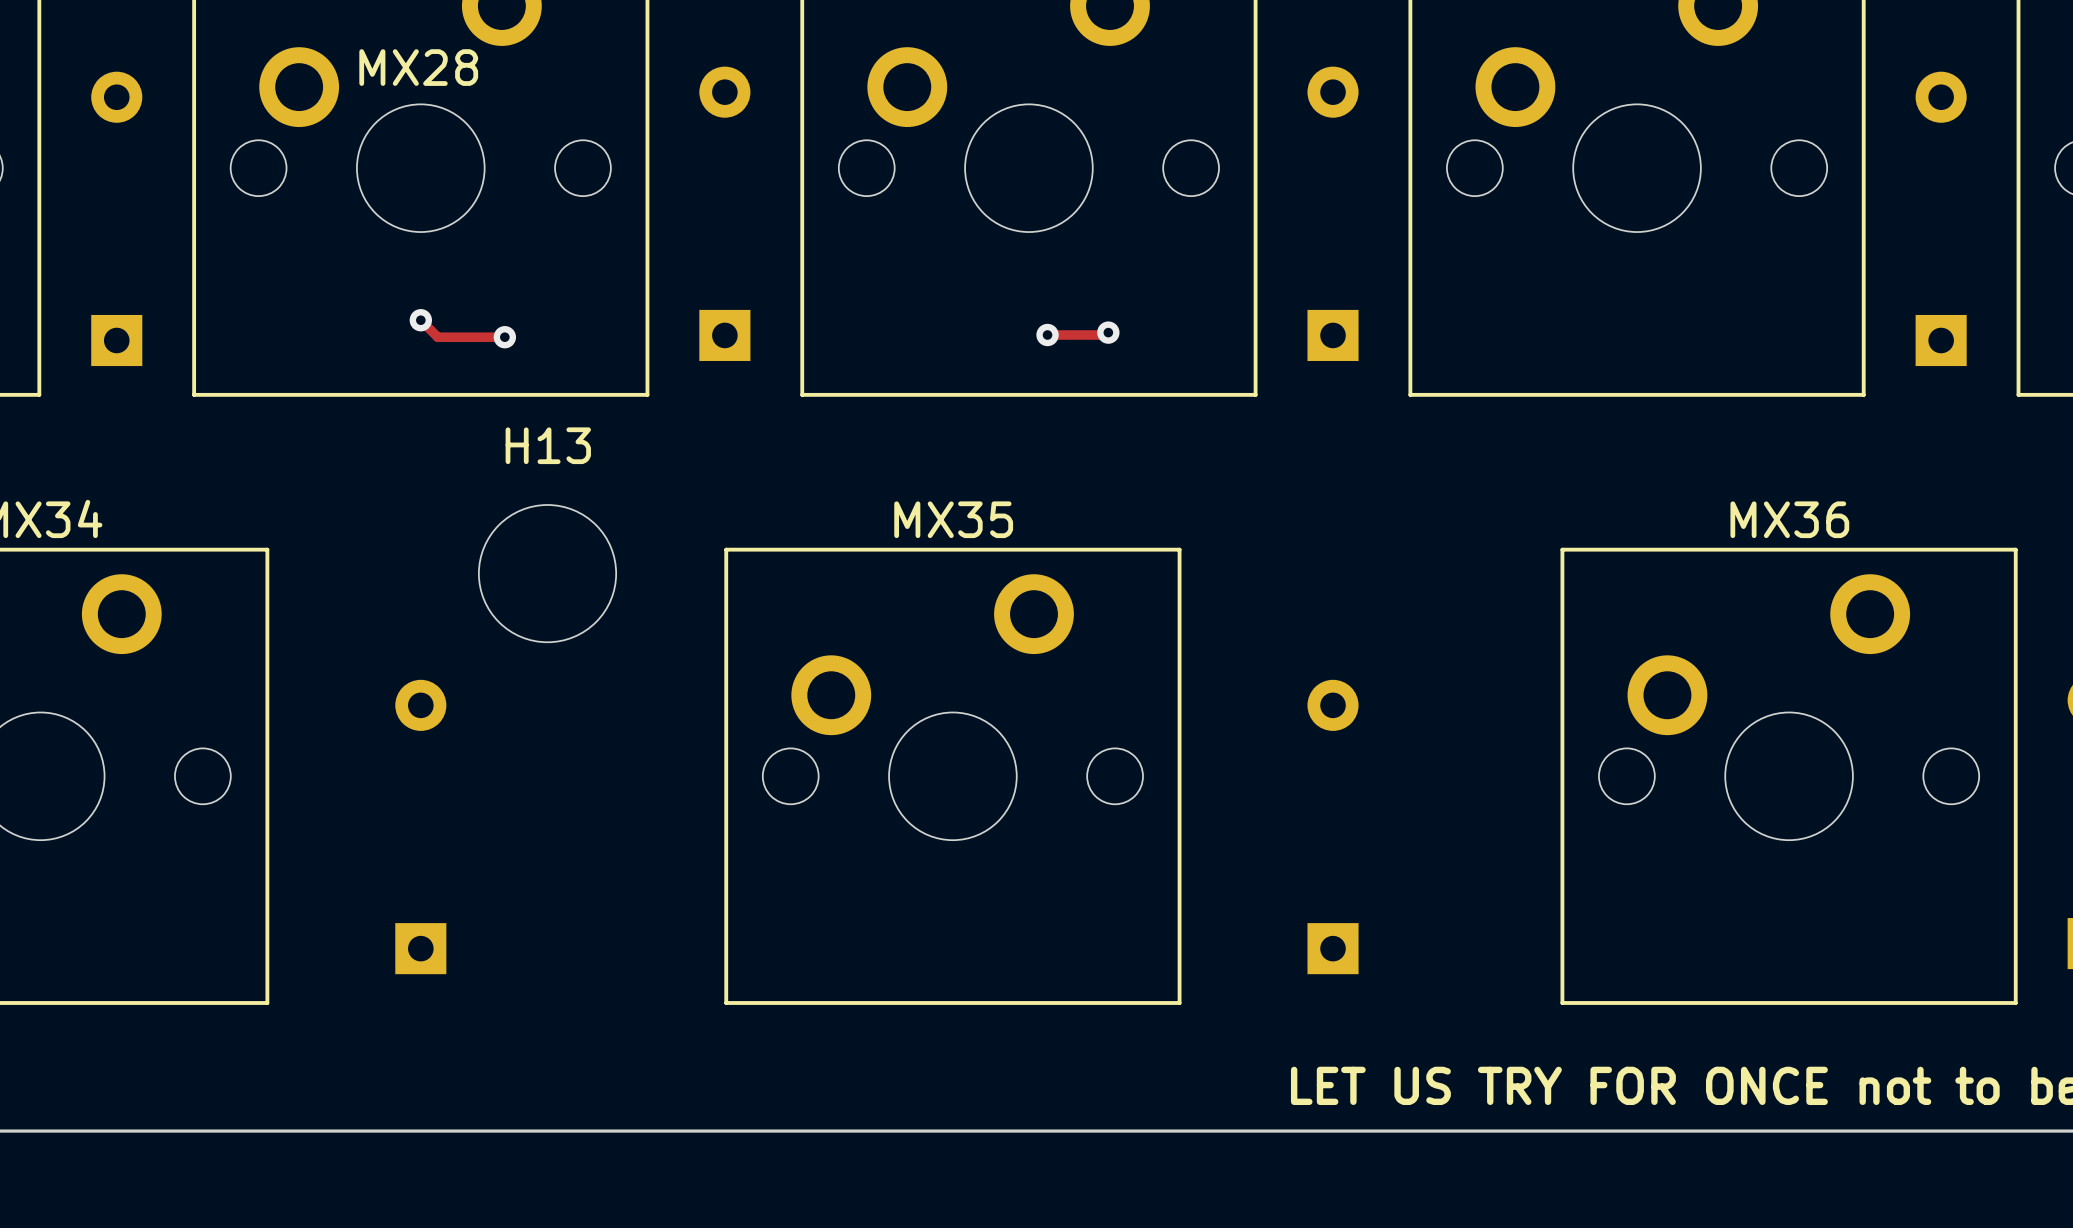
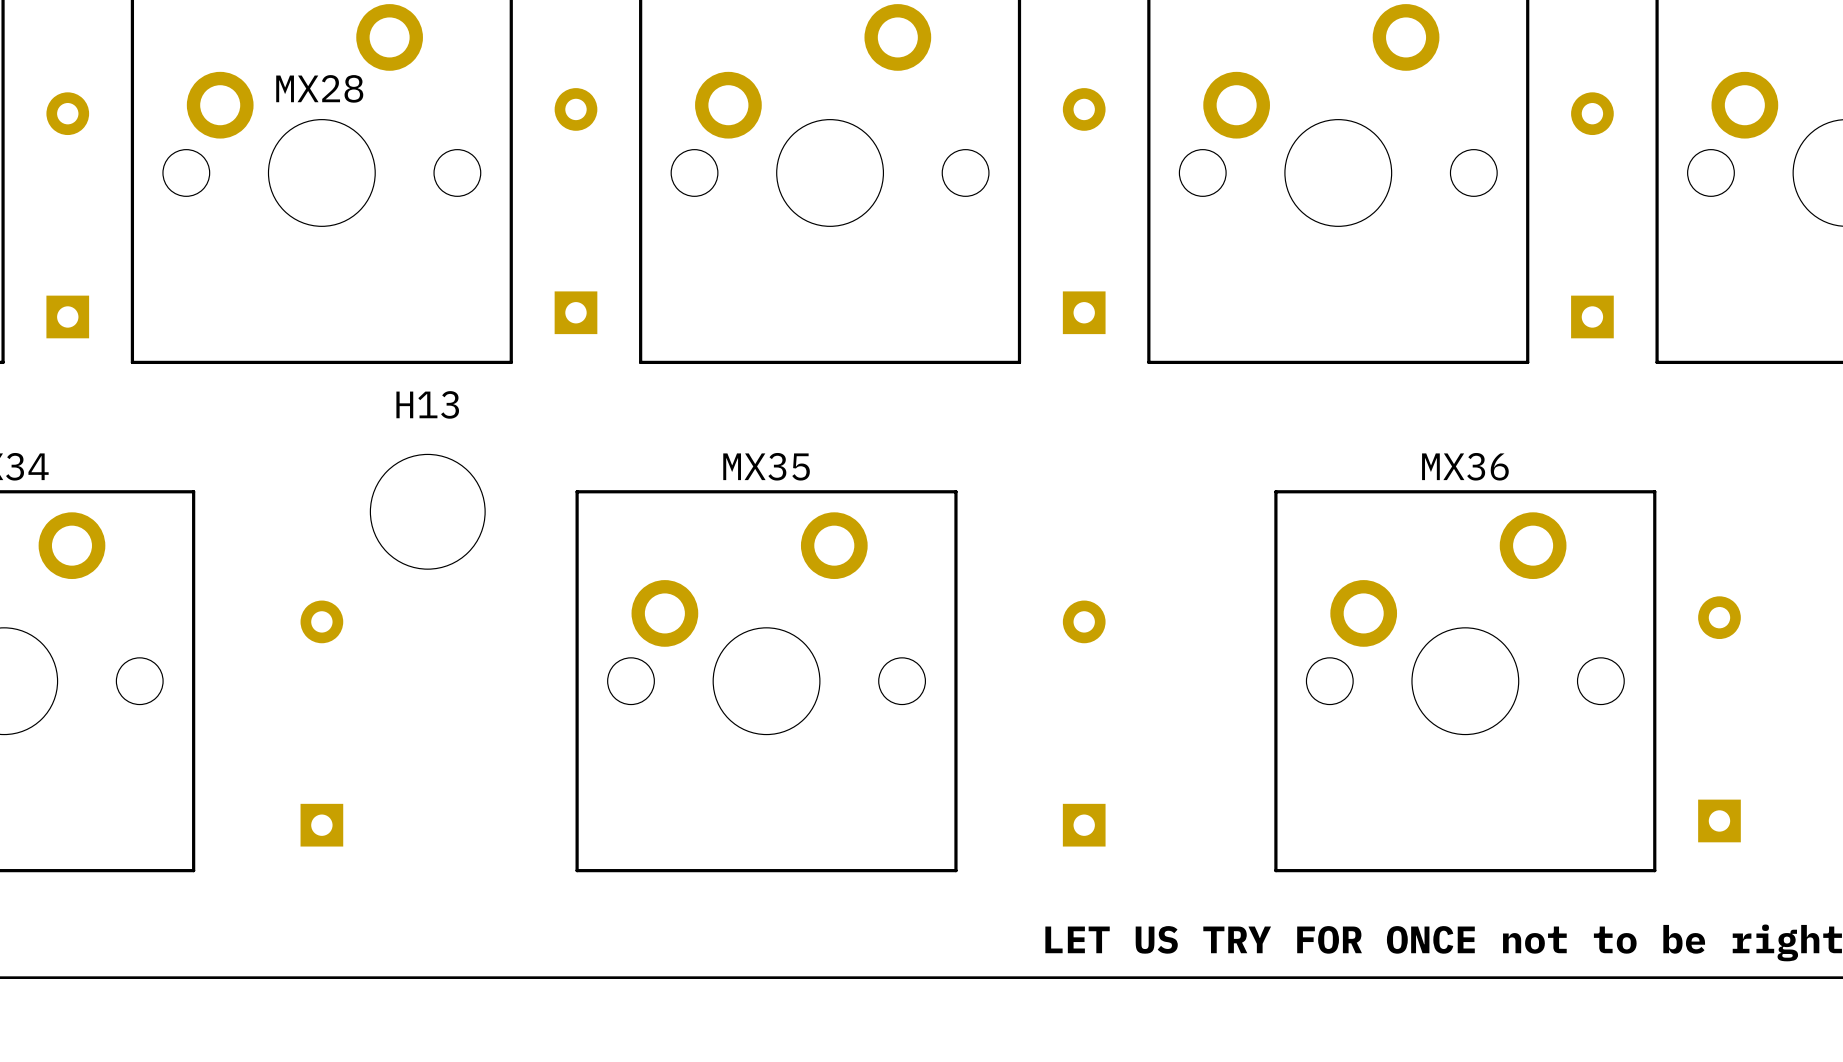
track: (420, 320) (437, 337) (504, 337) -> none
via: (420, 320) -> none
track: (1108, 332) (1105, 335) (1047, 335) -> none
via: (1108, 332) -> none
via: (1047, 335) -> none
via: (504, 337) -> none

